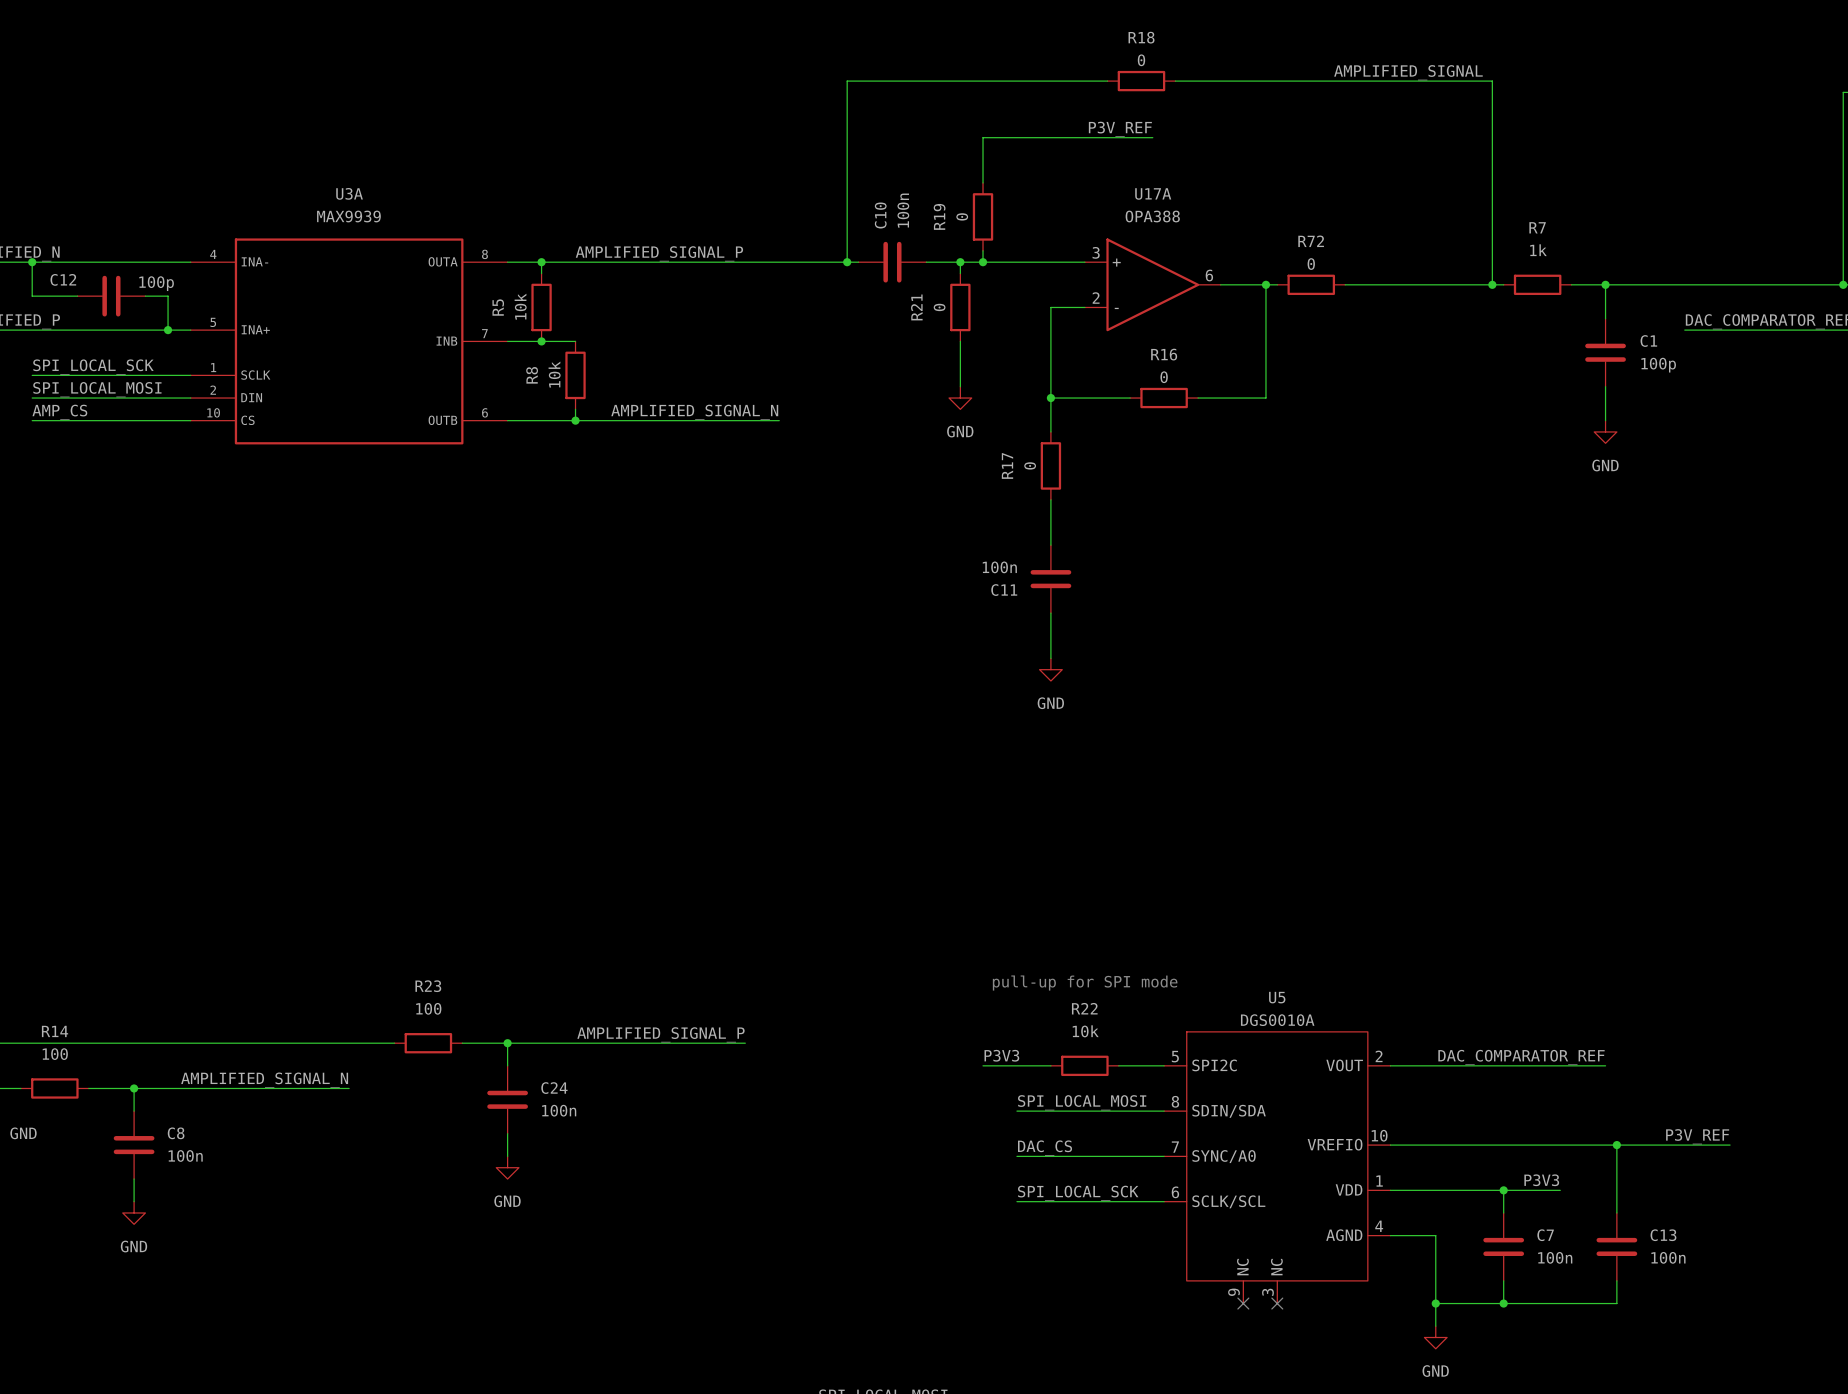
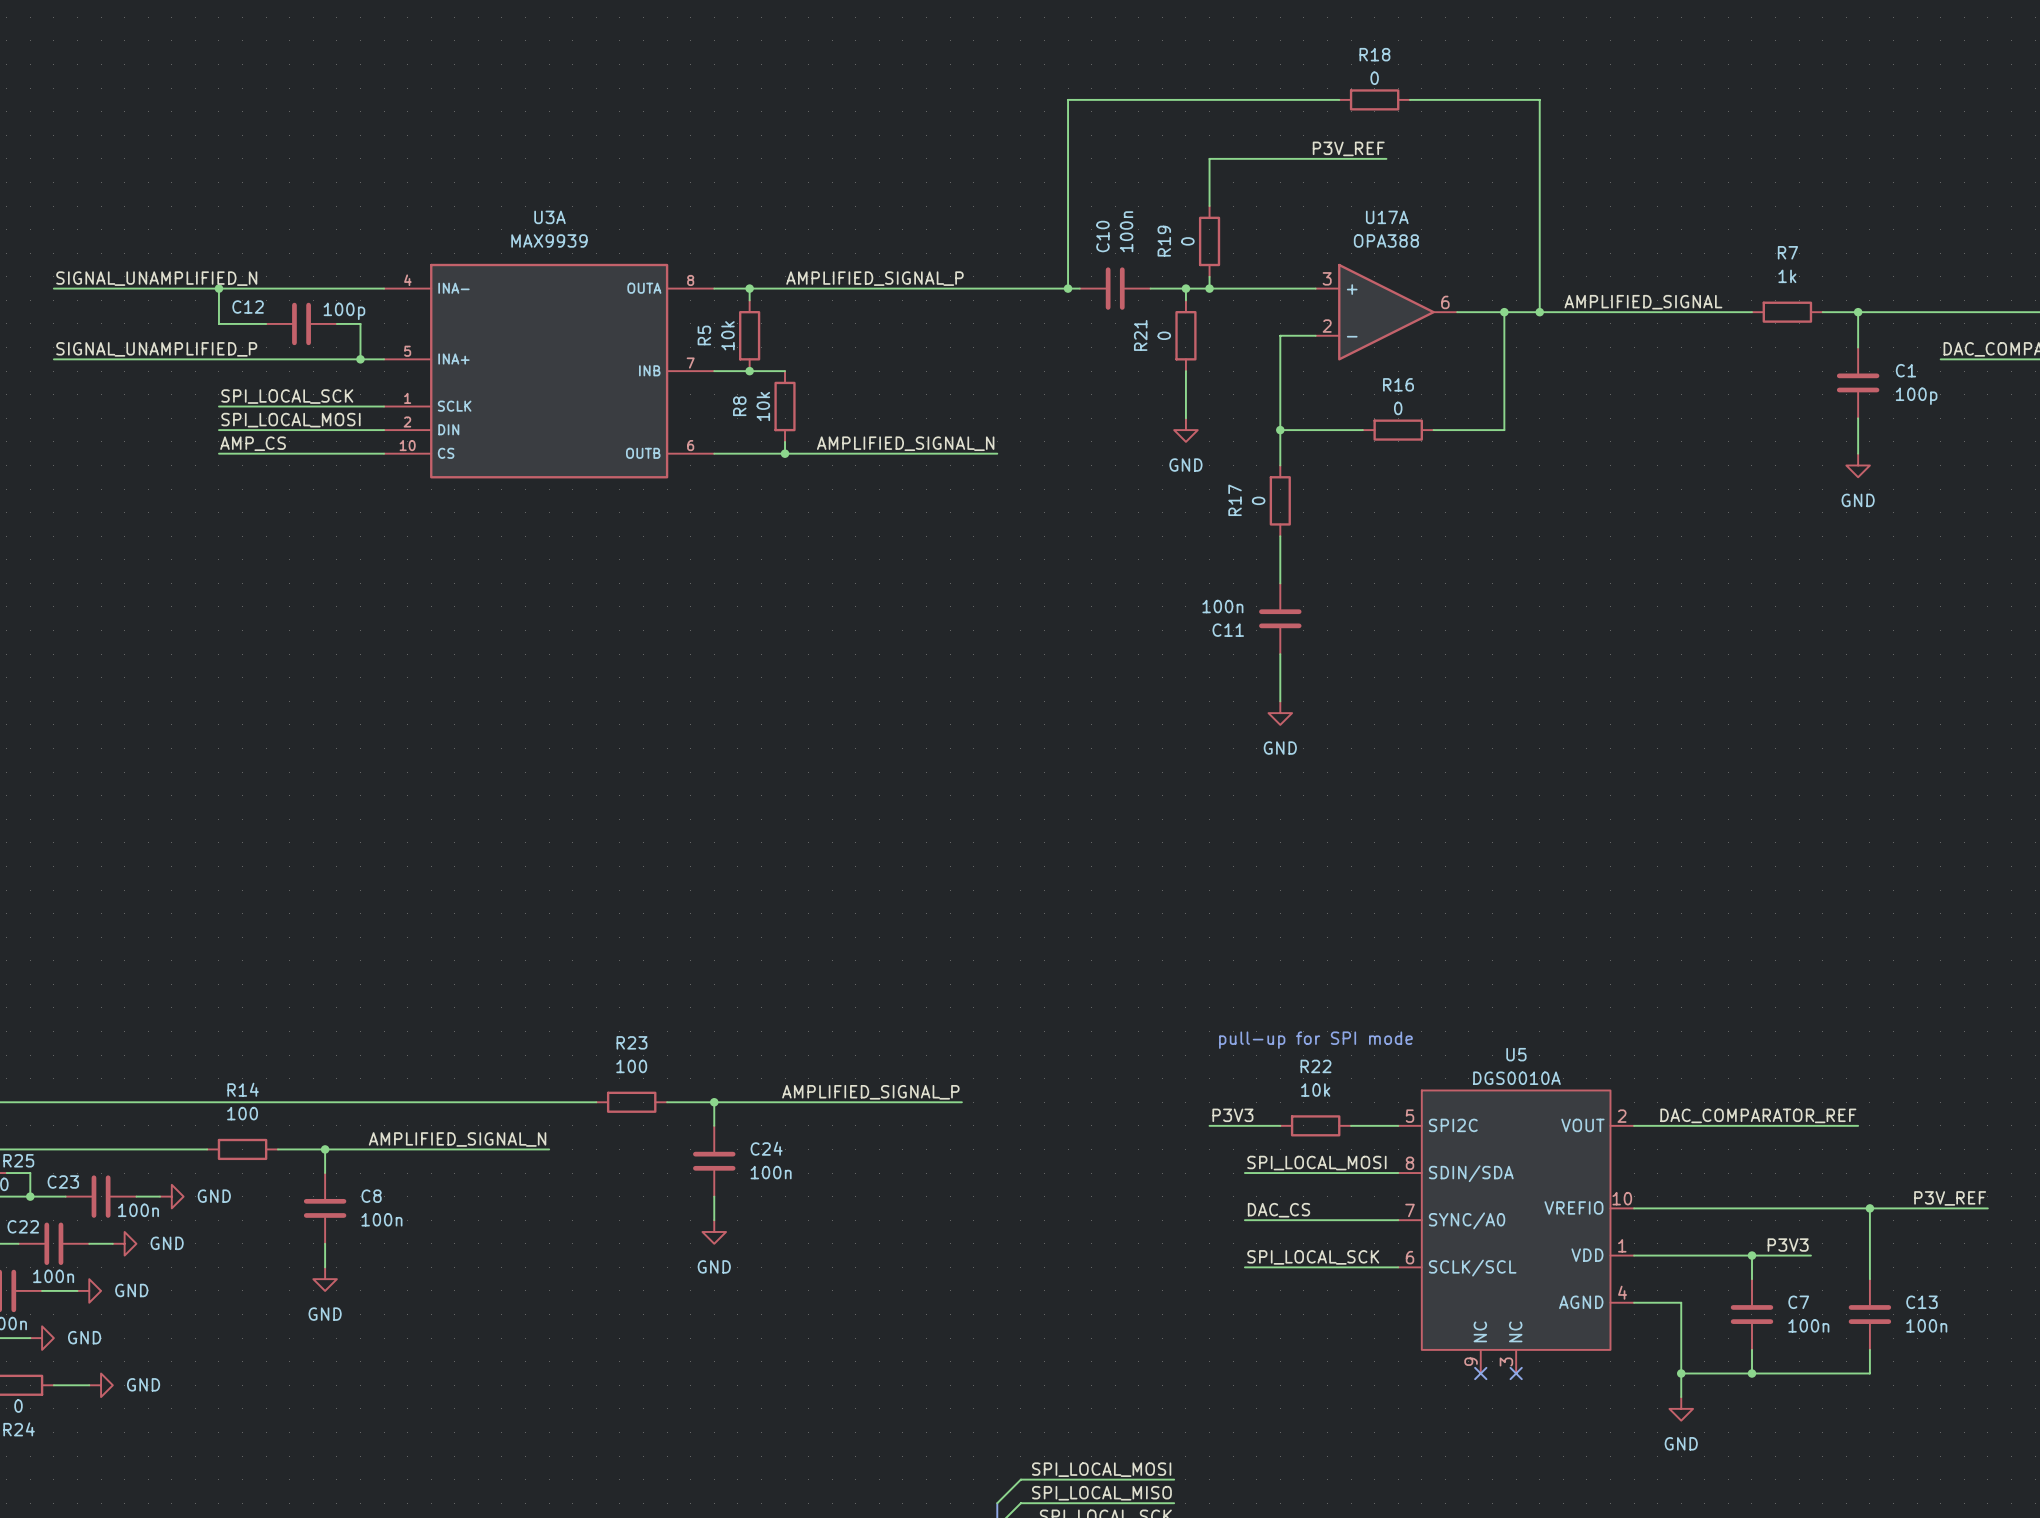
label position: AMPLIFIED_SIGNAL (1408, 72) -> AMPLIFIED_SIGNAL (1643, 302)
wire: (1299, 81) (1492, 81) (1492, 284) -> (1539, 99) (1539, 312)
wire: none -> (1516, 312) (1586, 312)
junction: none -> (1539, 312)
R72: 0 (1311, 284) -> none
junction: (1492, 284) -> none

